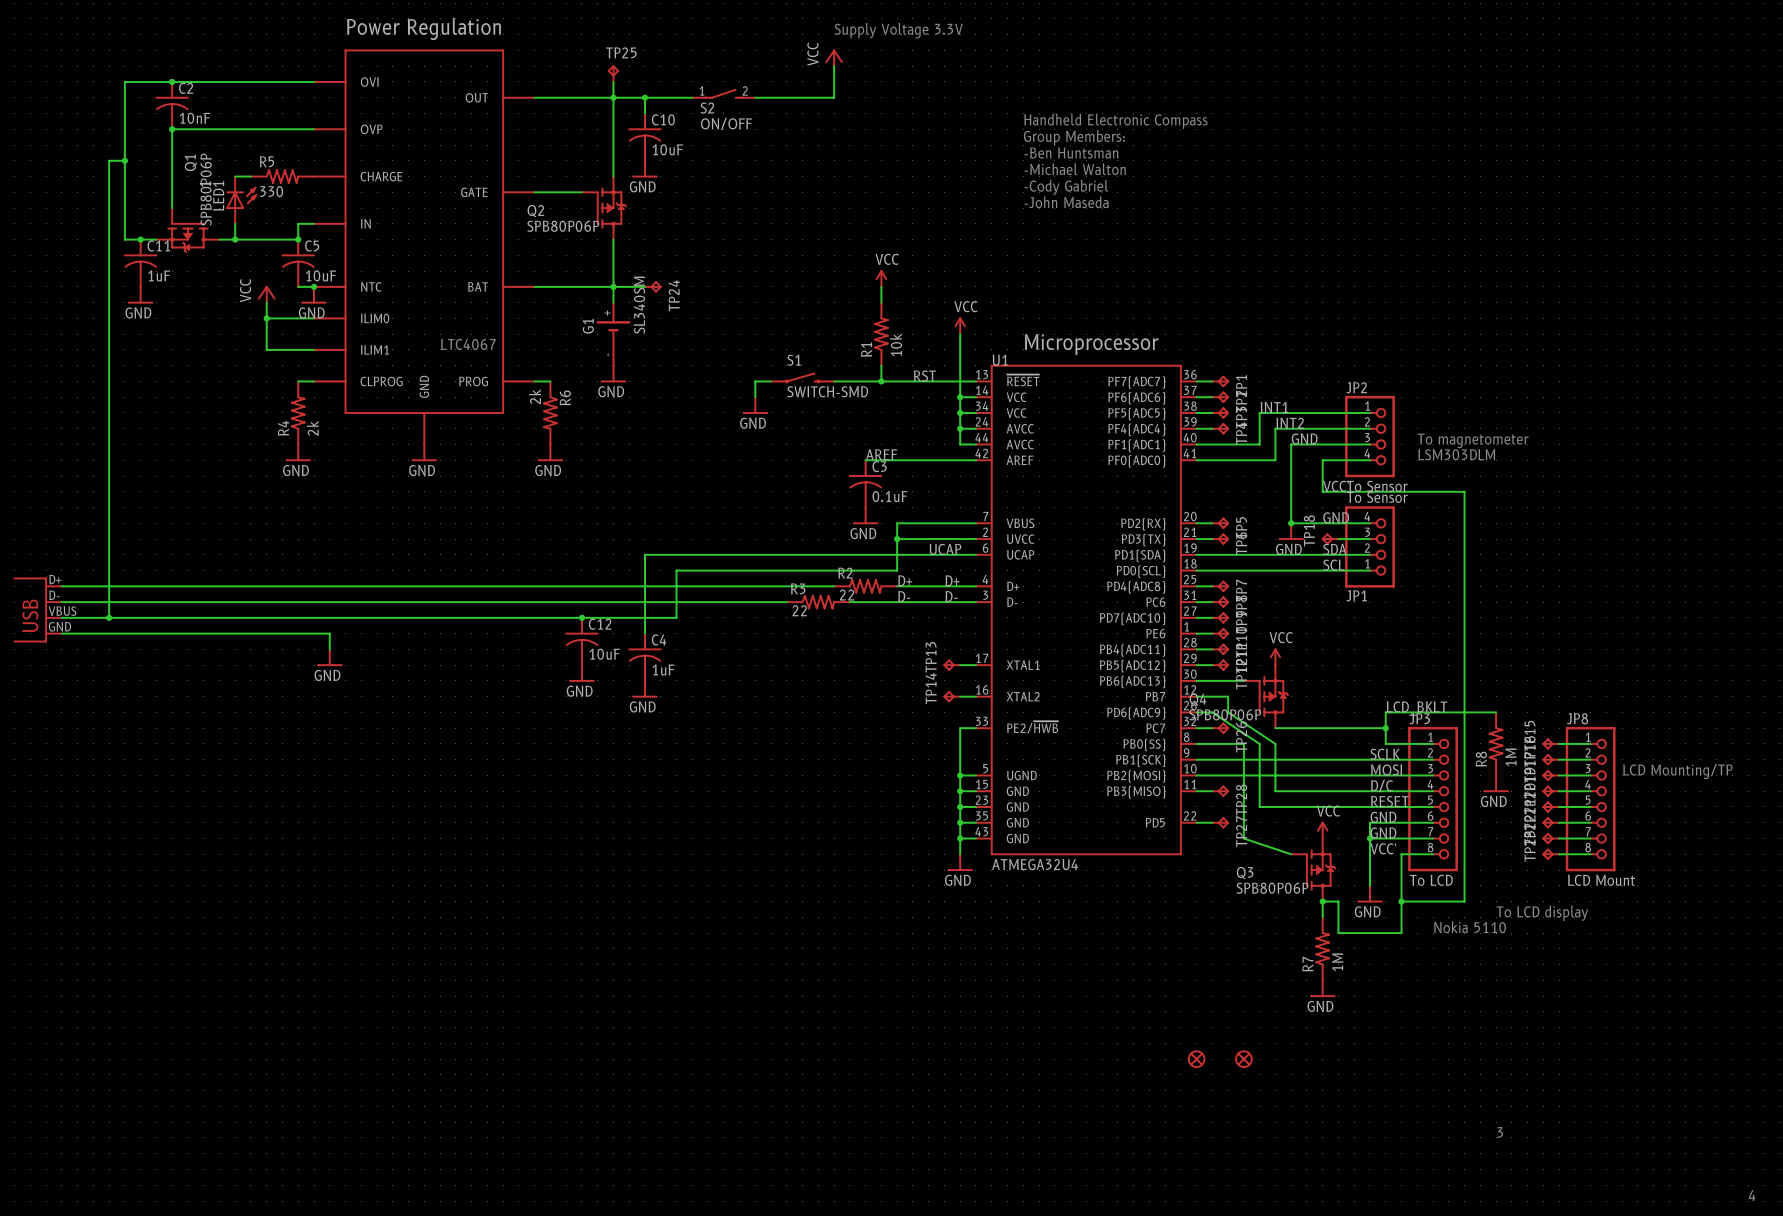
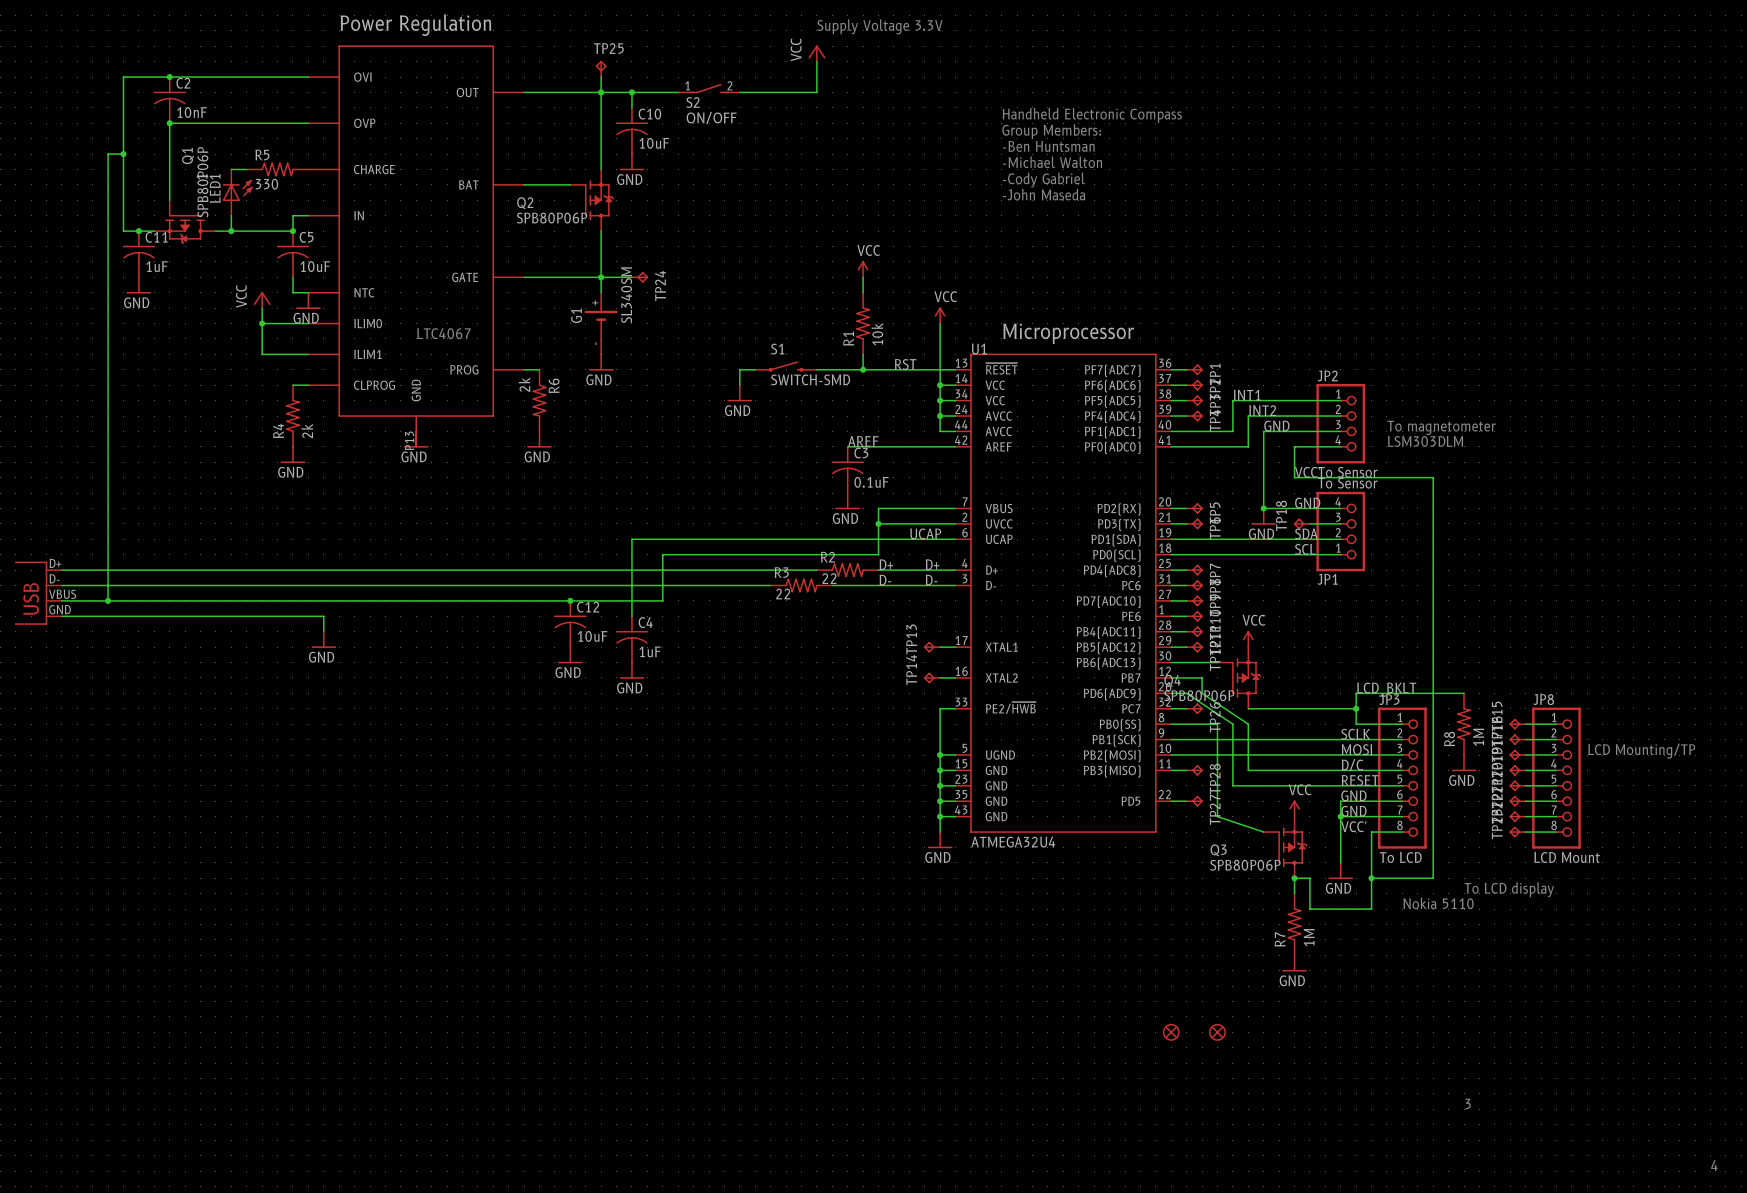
part: (424, 247) -> none
part: none -> (416, 246)
wire: (298, 286) (314, 286) -> (292, 277) (292, 292) (308, 292)
junction: (314, 286) -> none
power symbol position: VCC (266, 294) -> VCC (262, 300)
power symbol position: GND (314, 295) -> GND (308, 300)
wire: (266, 302) (266, 318) (314, 318) -> none
junction position: (266, 318) -> (262, 323)
wire: none -> (262, 323) (308, 323)
text position: LTC4067 (468, 344) -> LTC4067 (443, 333)
wire: (266, 349) (314, 349) -> (262, 338) (262, 354) (308, 354)
wire: (298, 381) (314, 381) -> (292, 385) (308, 385)
R4 position: (298, 412) -> (292, 416)
power symbol position: GND (298, 452) -> GND (292, 454)

